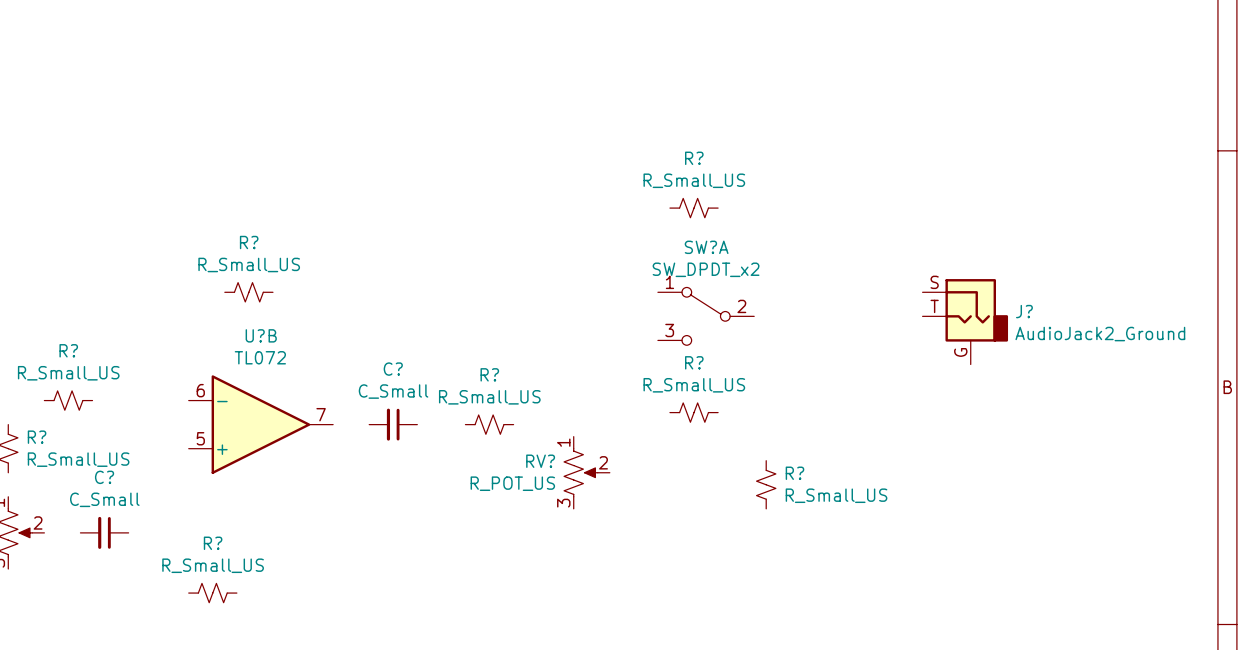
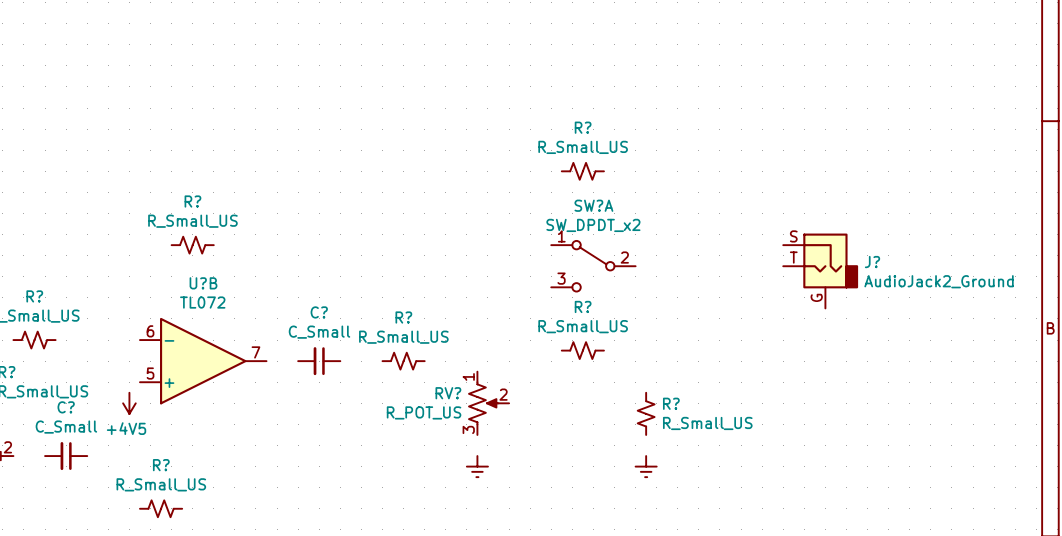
power symbol: none -> +4V5 (129, 403)
power symbol: none -> (477, 466)
power symbol: none -> (646, 466)

